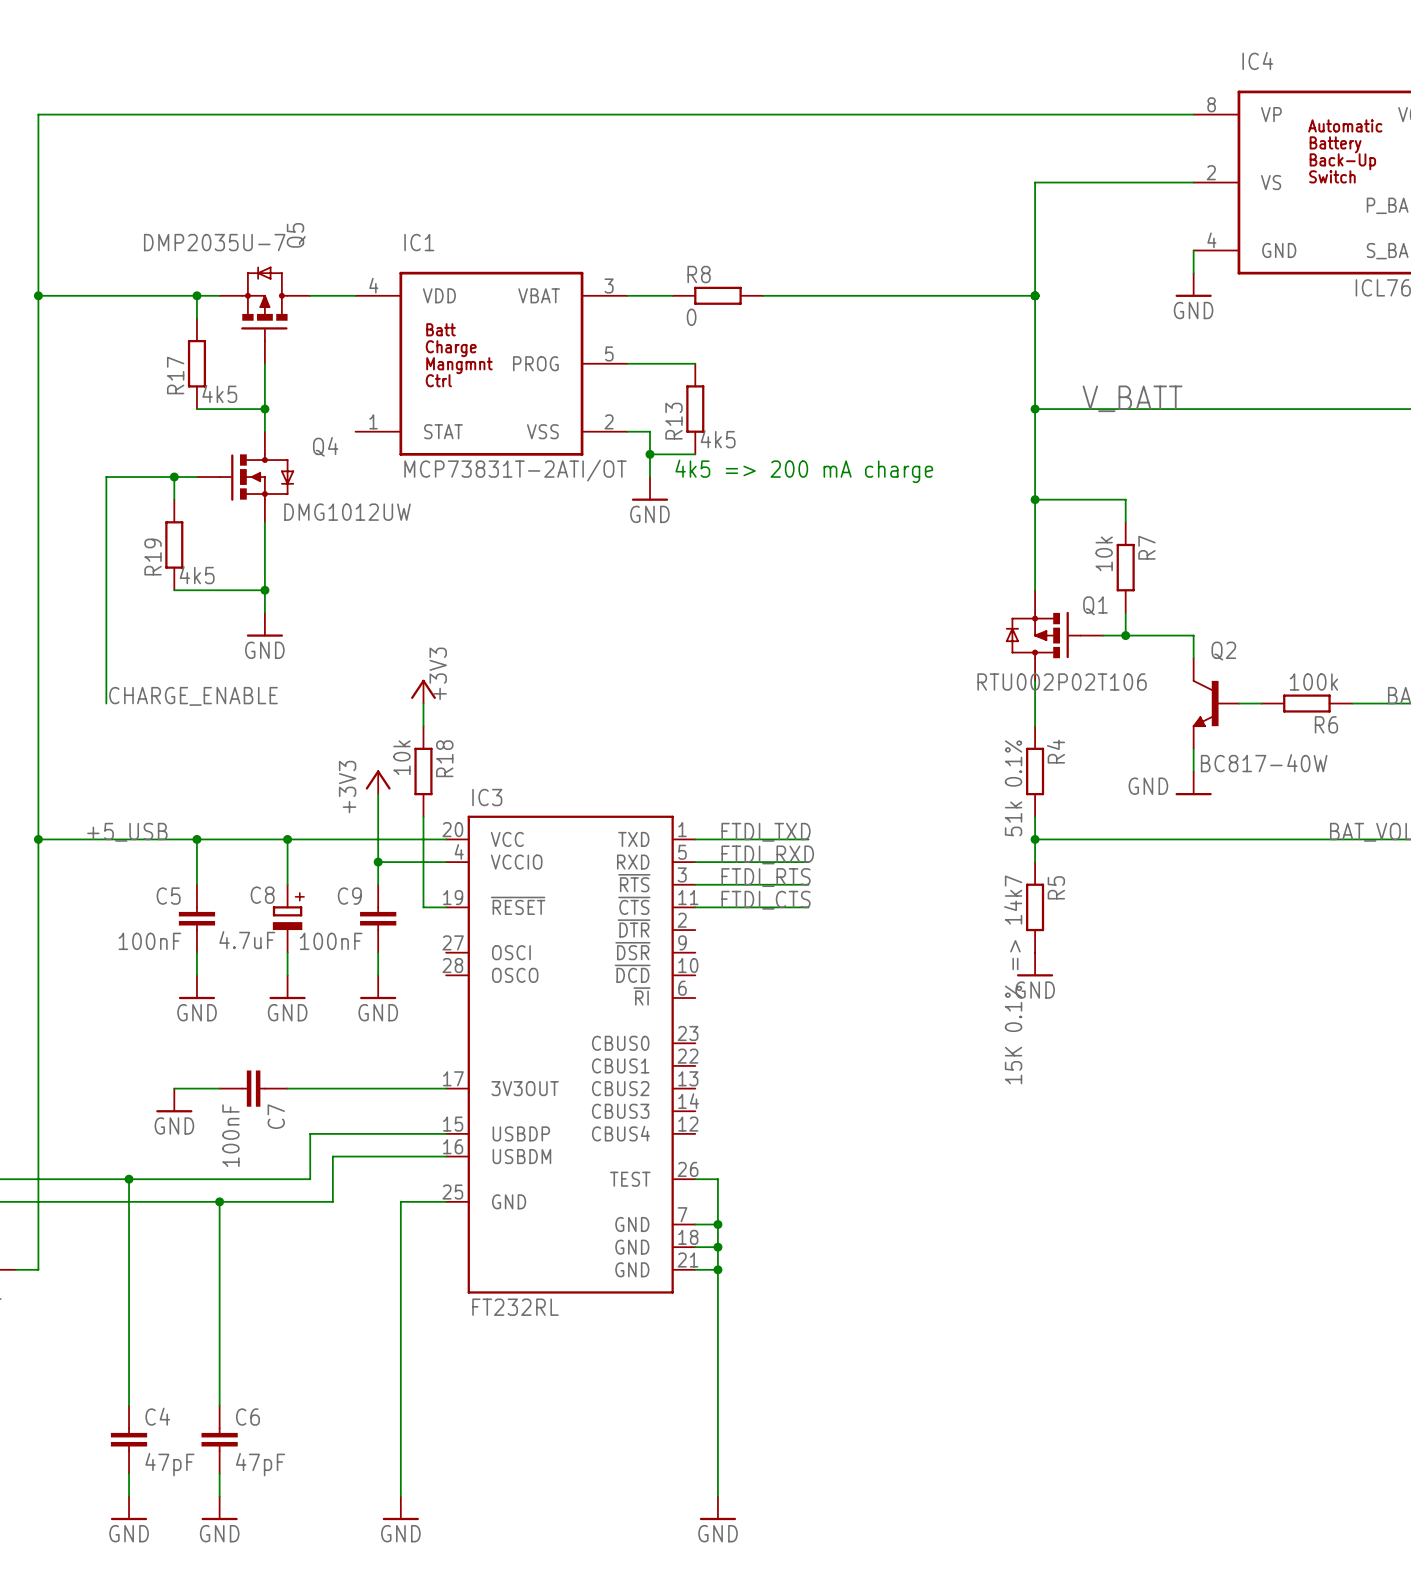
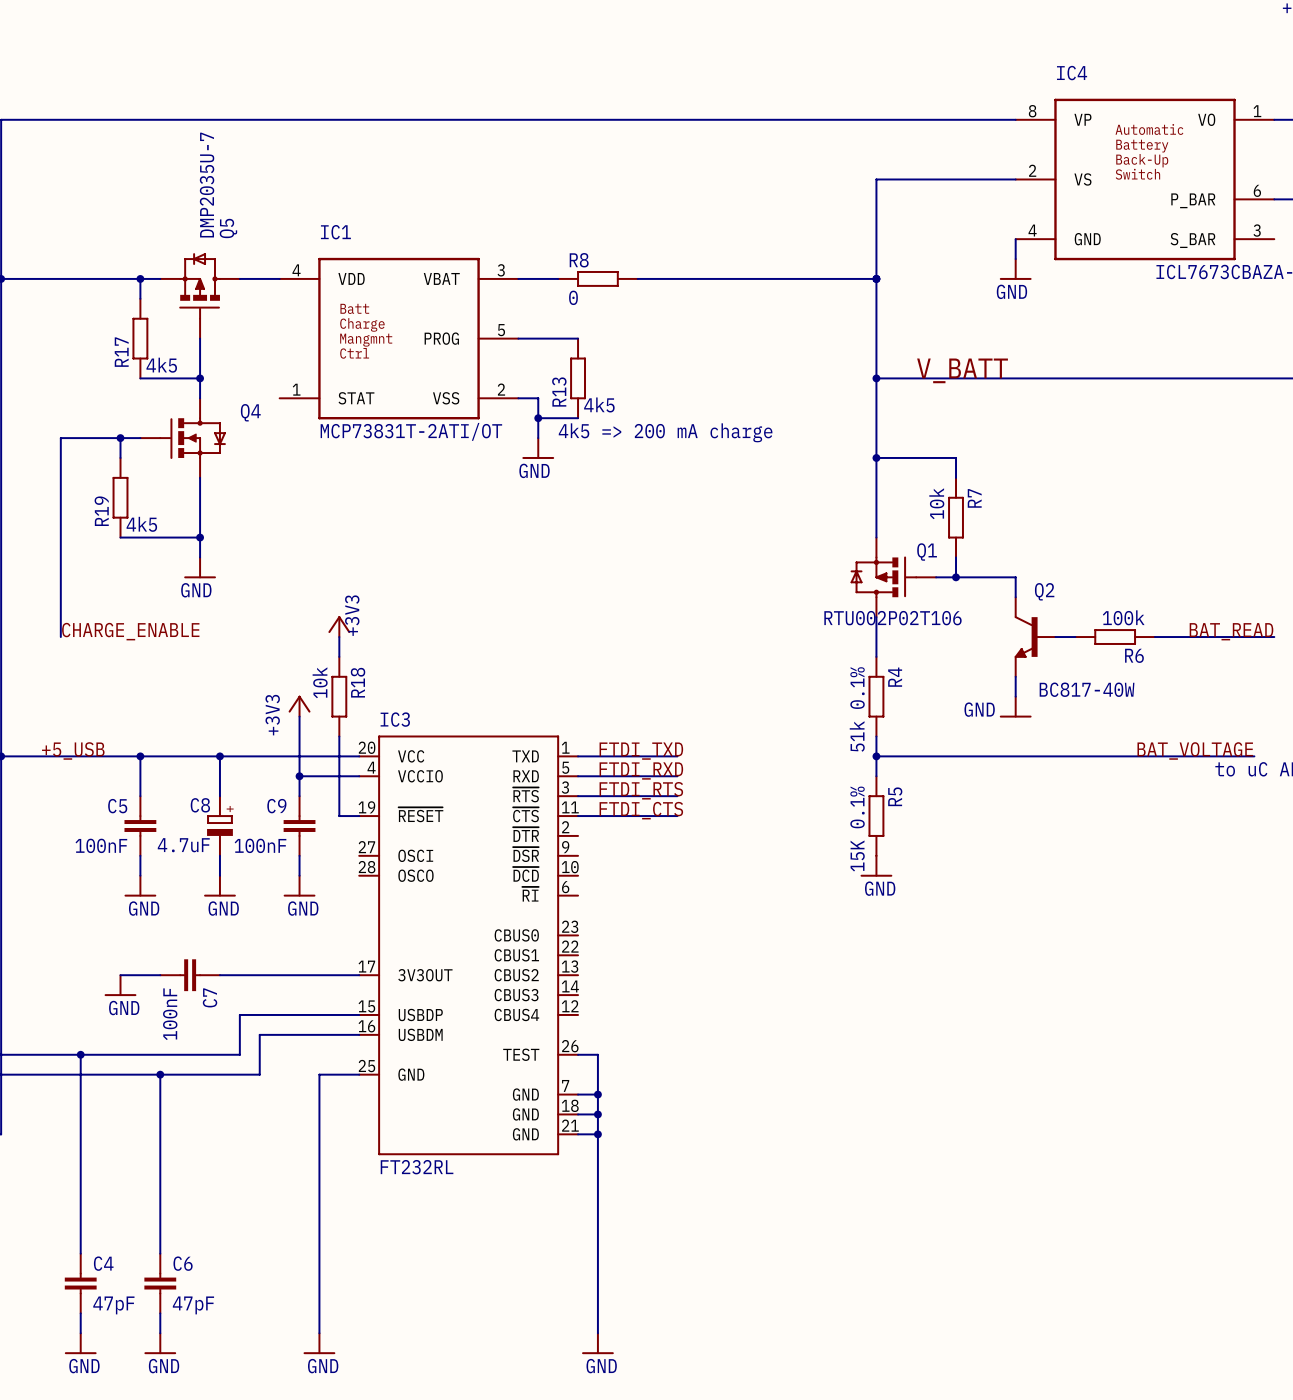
Q5 value rotation: 0° (214, 242) -> 90° counterclockwise (207, 185)
Q4 value: DMG1012UW (347, 512) -> none
R5 value: 15K 0.1% => 14k7 (1013, 979) -> 15K 0.1% (857, 828)

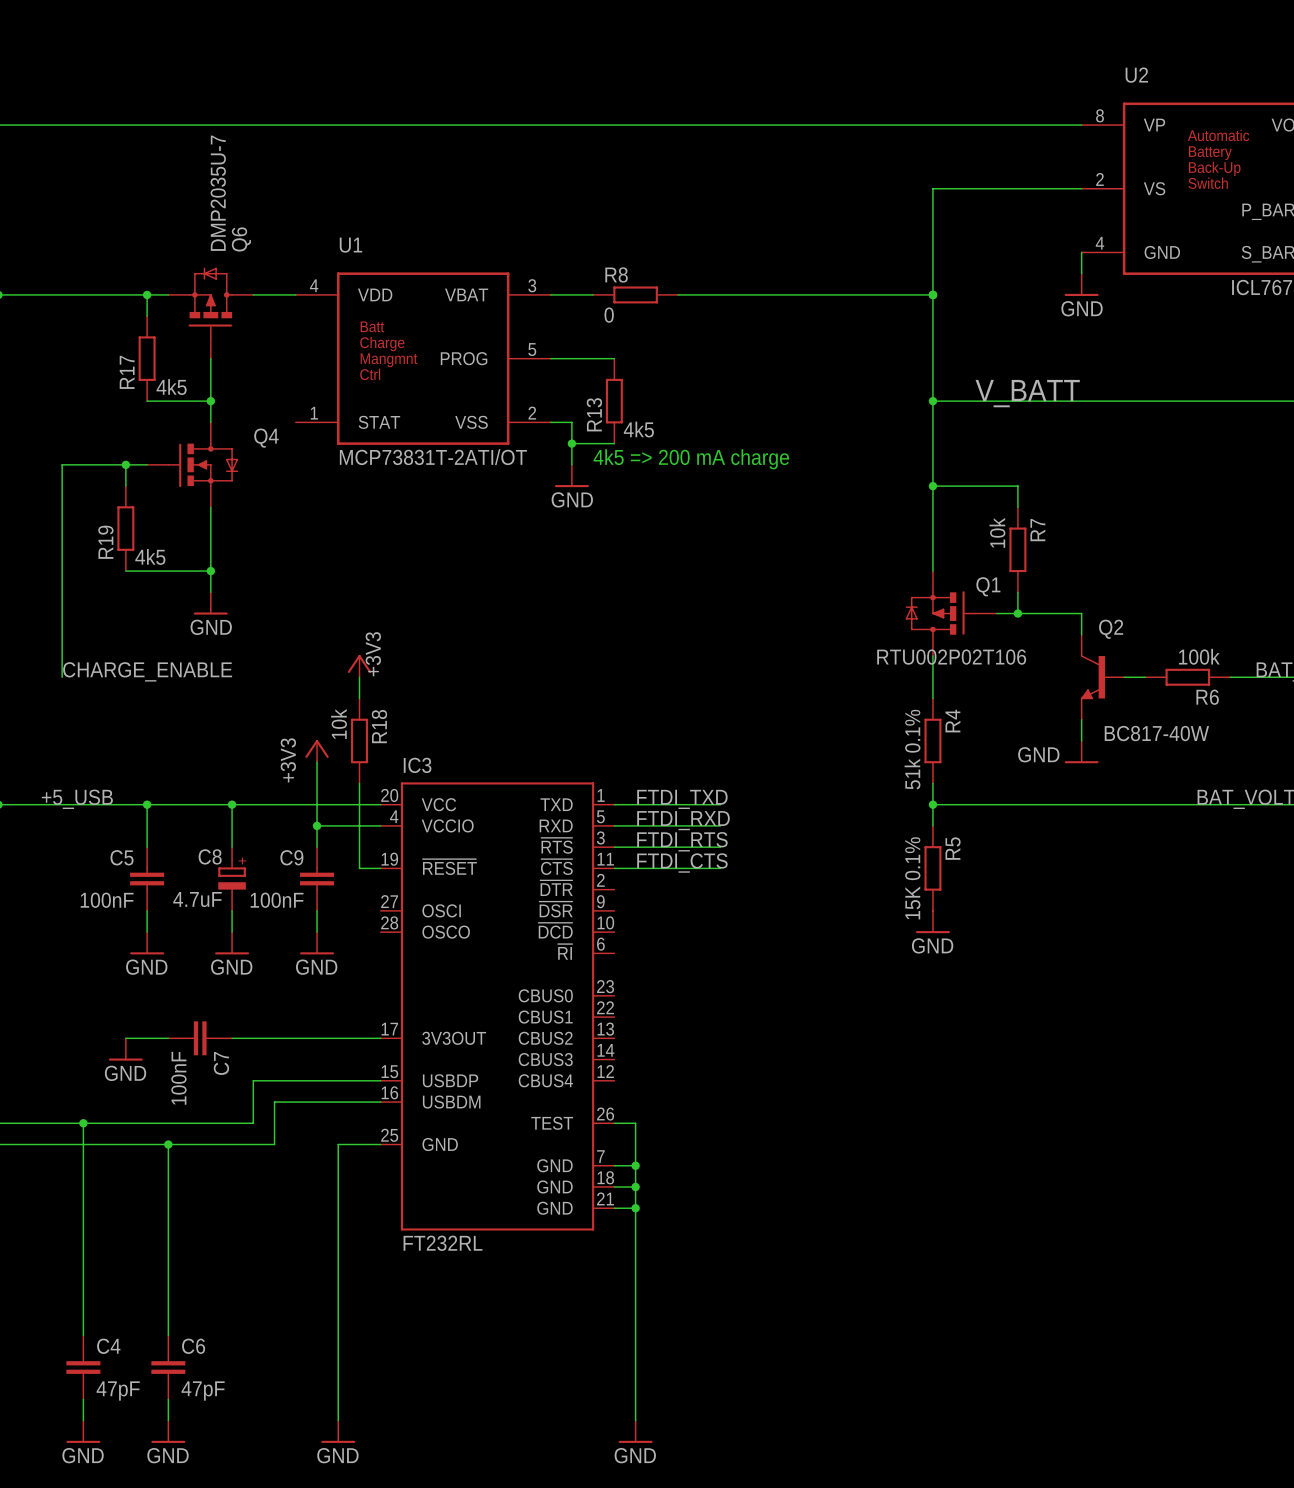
IC4 name: IC4 (1072, 73) -> U2 (1136, 75)
Q5 name: Q5 (228, 228) -> Q6 (241, 239)
IC1 name: IC1 (335, 232) -> U1 (350, 245)

